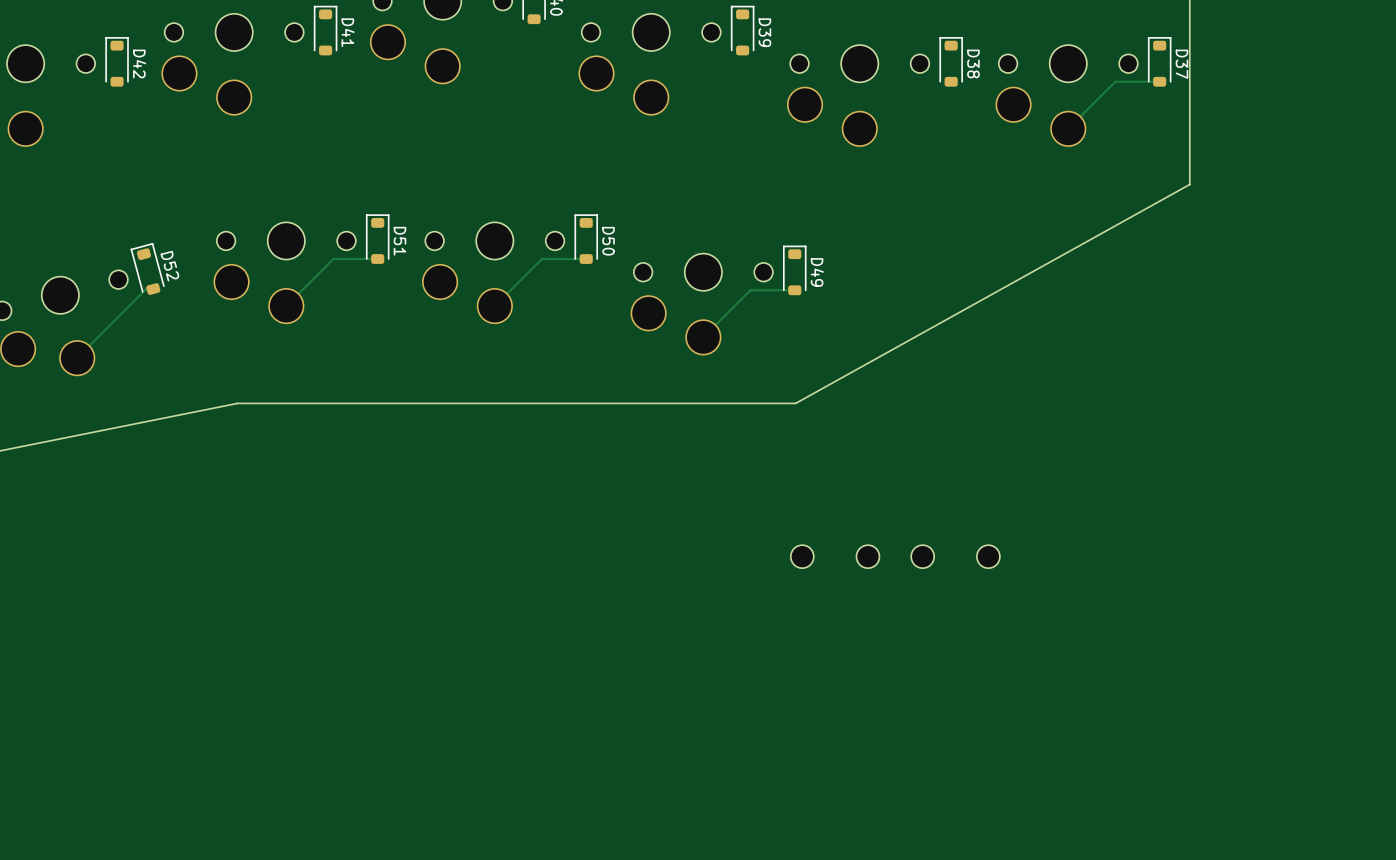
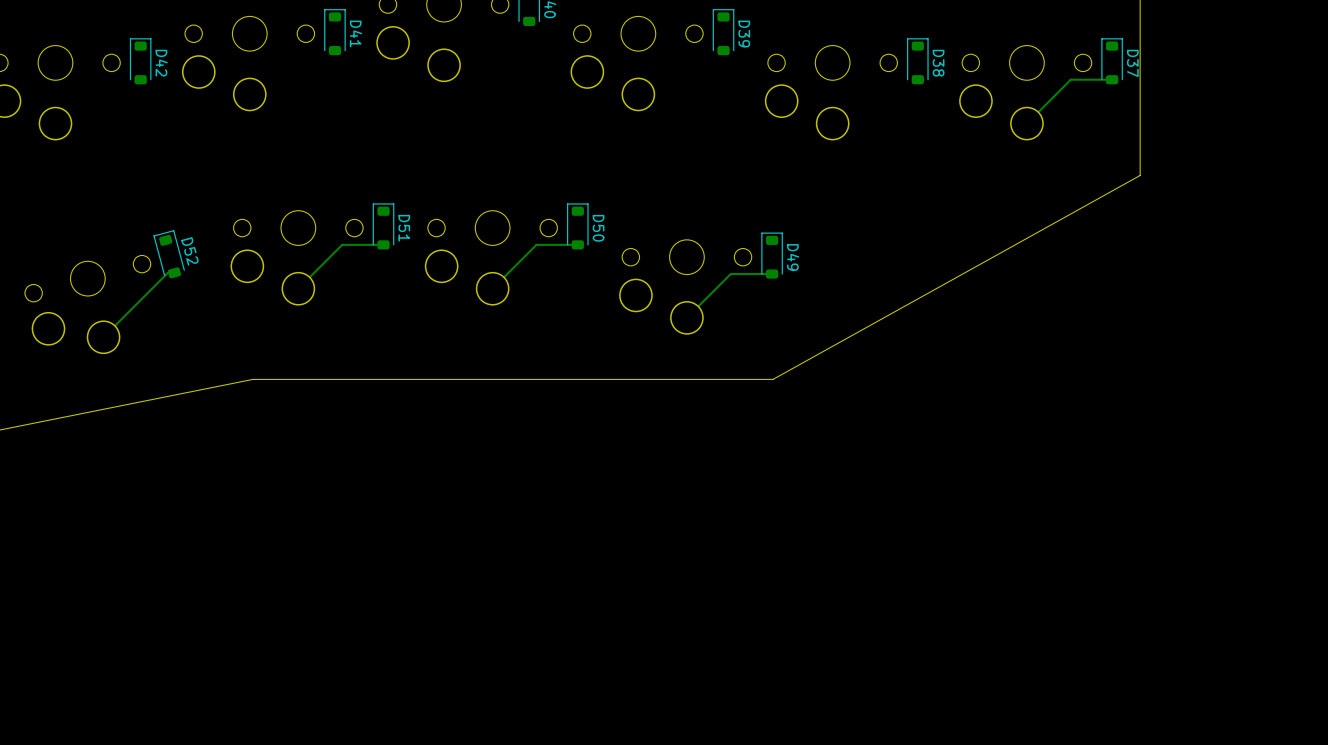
part: (802, 556) -> none
part: (867, 556) -> none
part: (922, 556) -> none
part: (988, 556) -> none

